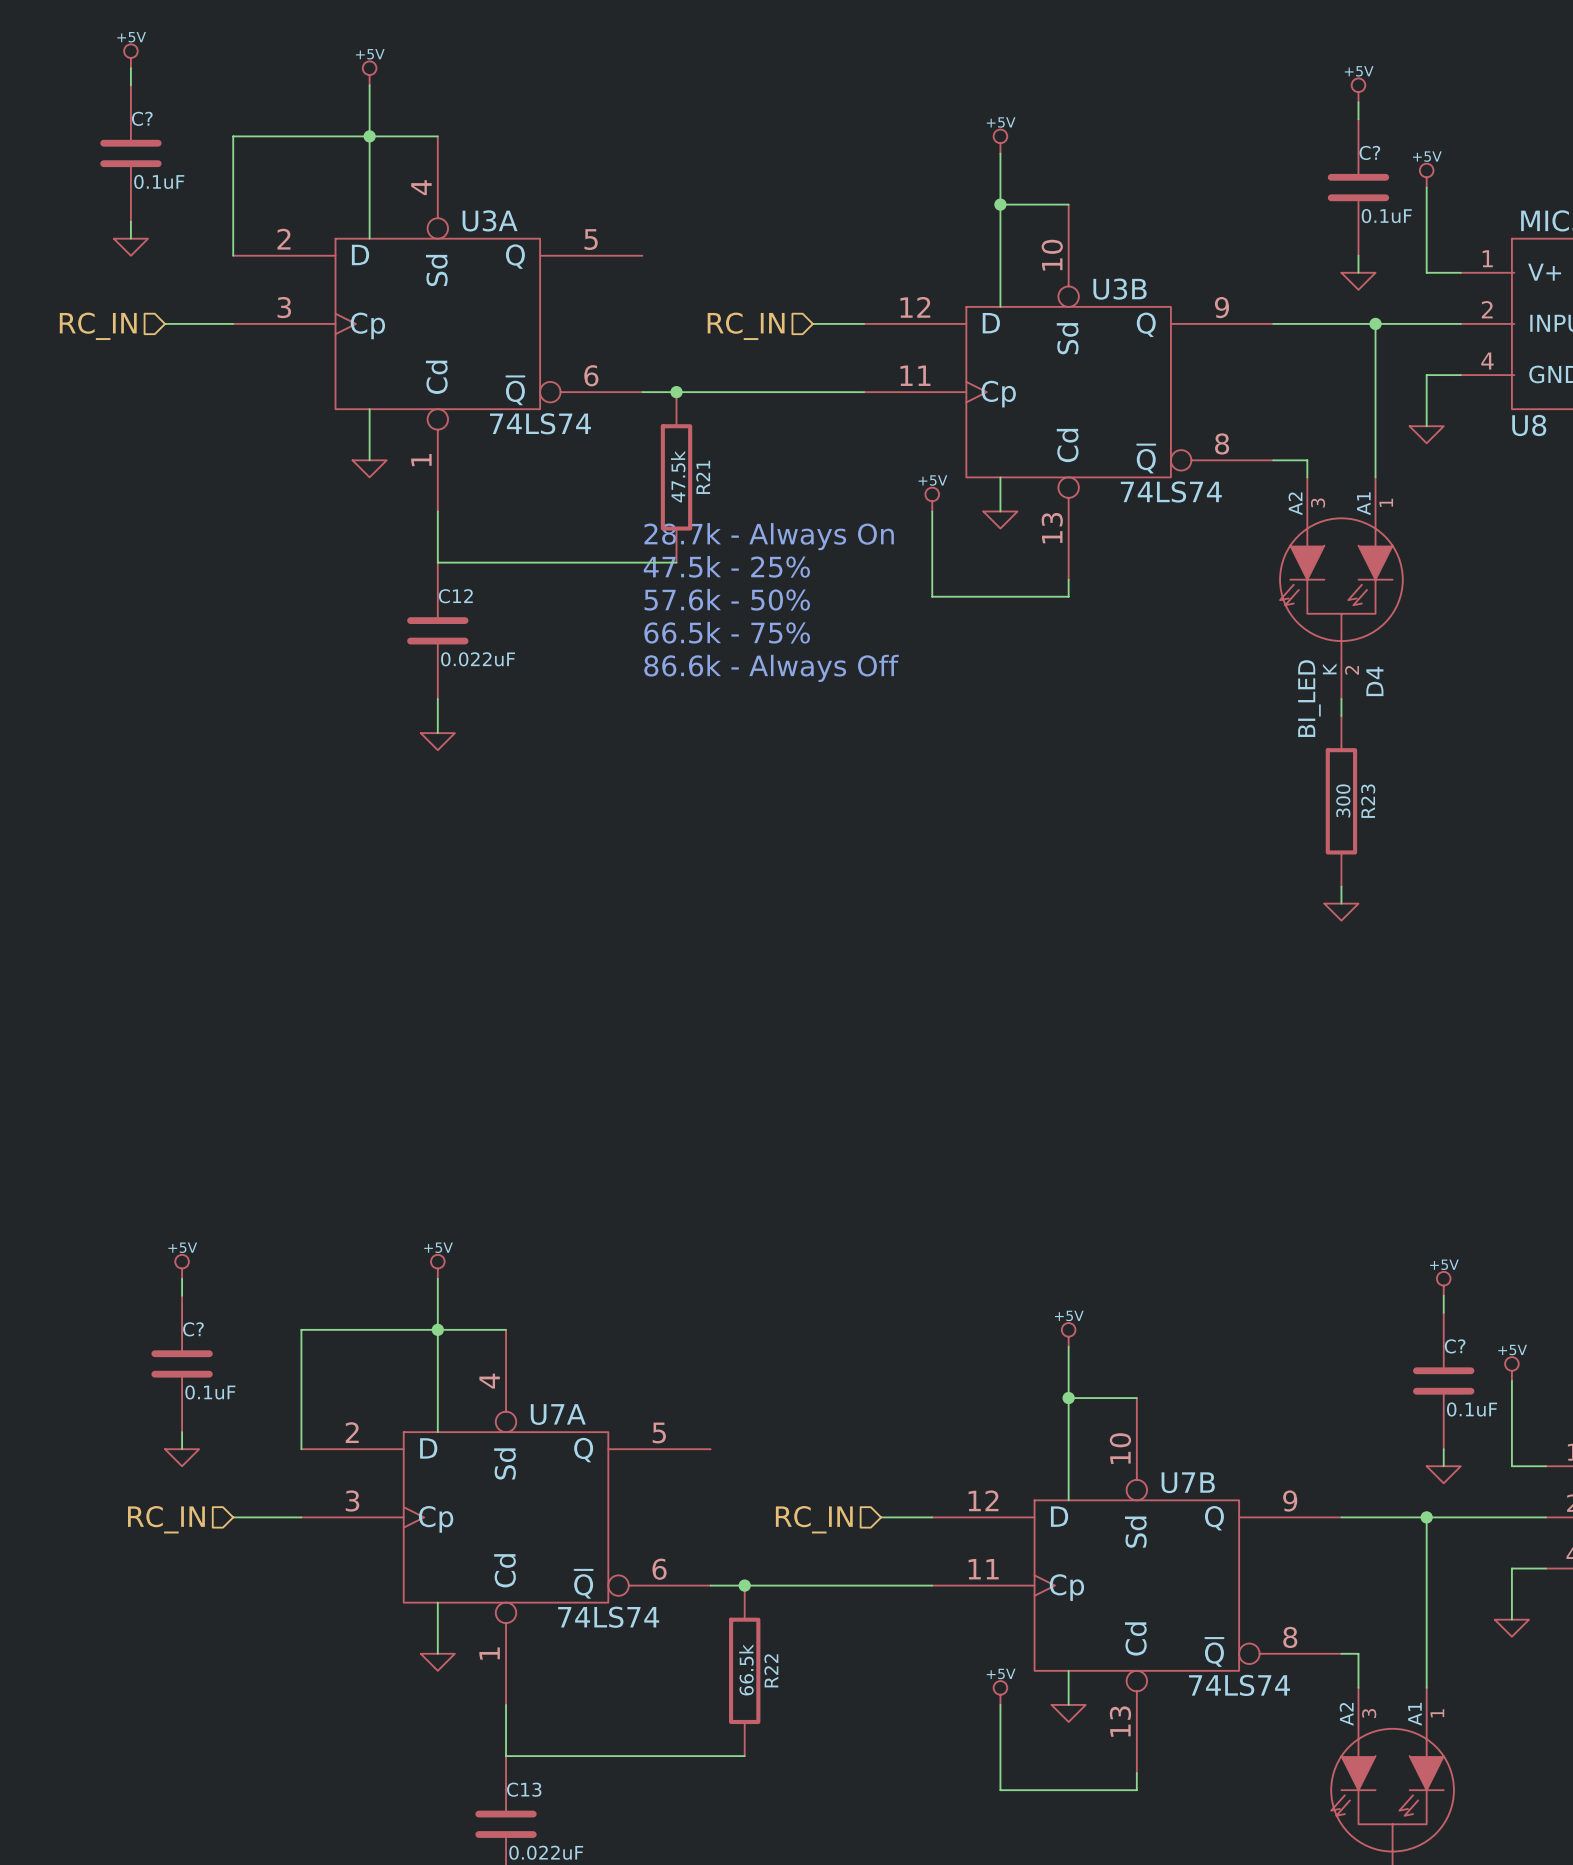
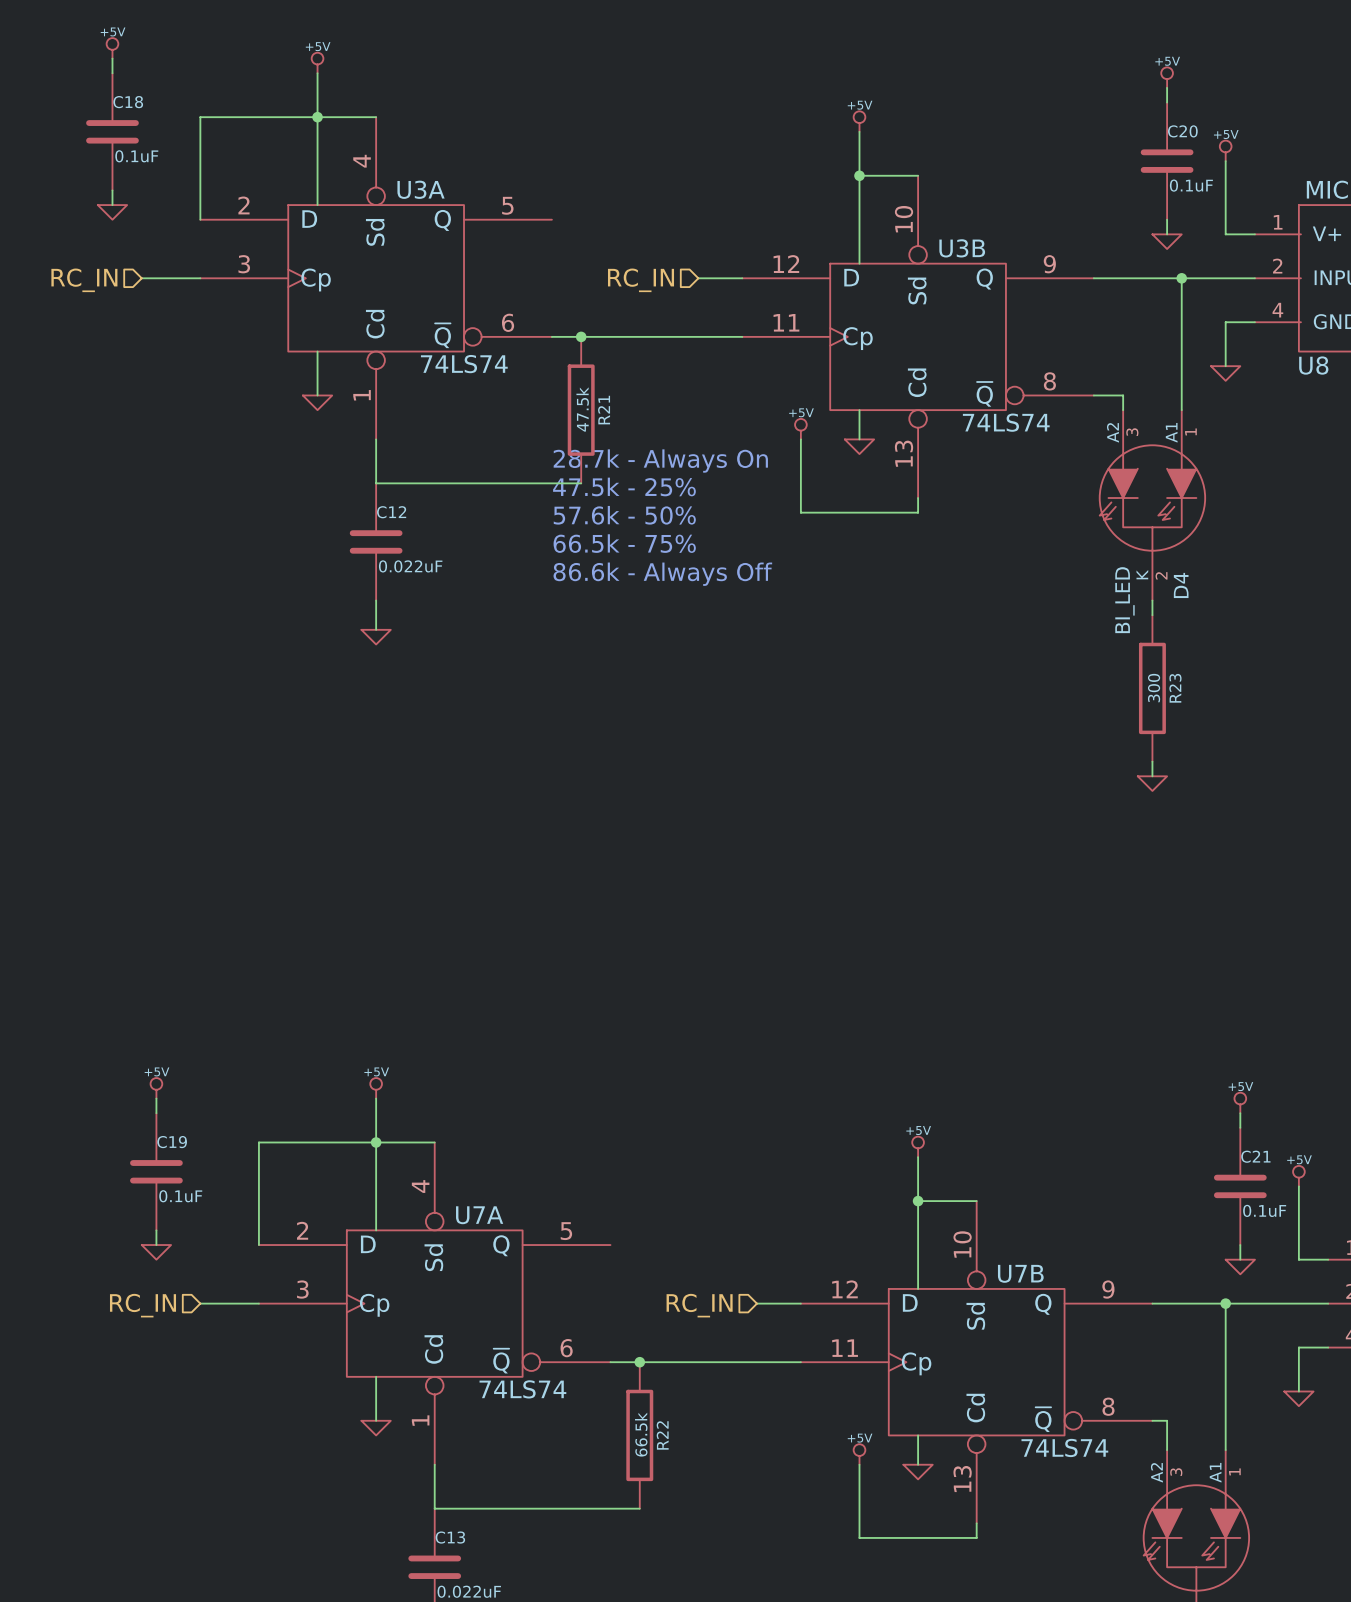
C? name: C? (142, 118) -> C18 (128, 102)
C? name: C? (1369, 152) -> C20 (1182, 131)
C? name: C? (193, 1329) -> C19 (172, 1142)
C? name: C? (1455, 1346) -> C21 (1255, 1156)

